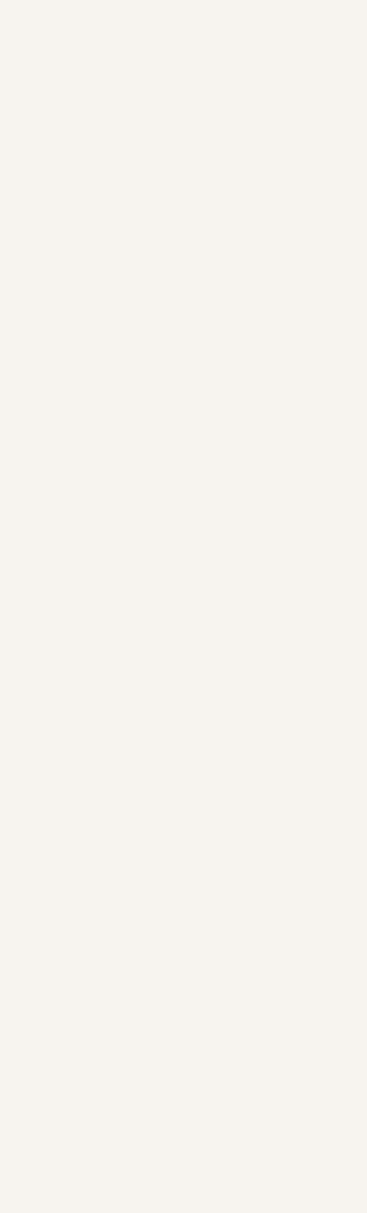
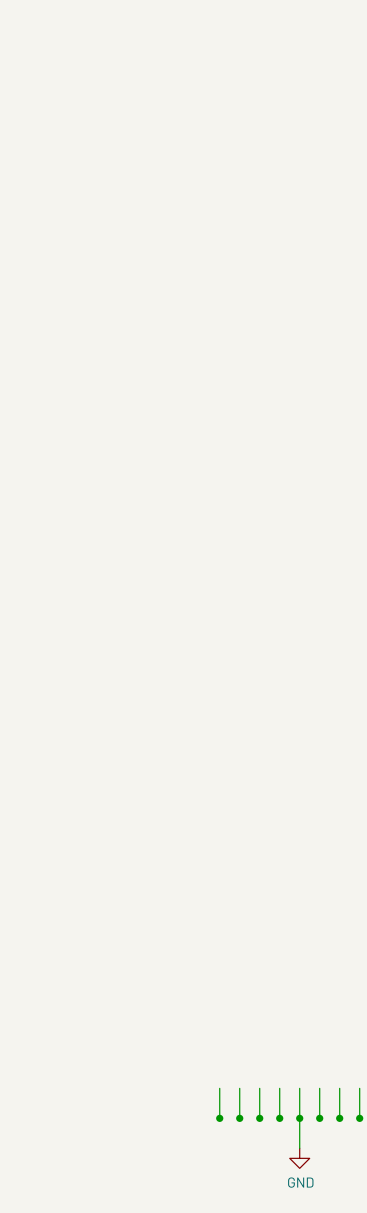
wire: none -> (219, 1088) (219, 1118)
wire: none -> (239, 1088) (239, 1118)
wire: none -> (259, 1088) (259, 1118)
wire: none -> (279, 1088) (279, 1118)
wire: none -> (299, 1088) (299, 1148)
wire: none -> (319, 1088) (319, 1118)
wire: none -> (339, 1088) (339, 1118)
wire: none -> (359, 1088) (359, 1118)
junction: none -> (219, 1118)
junction: none -> (239, 1118)
junction: none -> (259, 1118)
junction: none -> (279, 1118)
junction: none -> (299, 1118)
junction: none -> (319, 1118)
junction: none -> (339, 1118)
junction: none -> (359, 1118)
power symbol: none -> GND (299, 1158)

